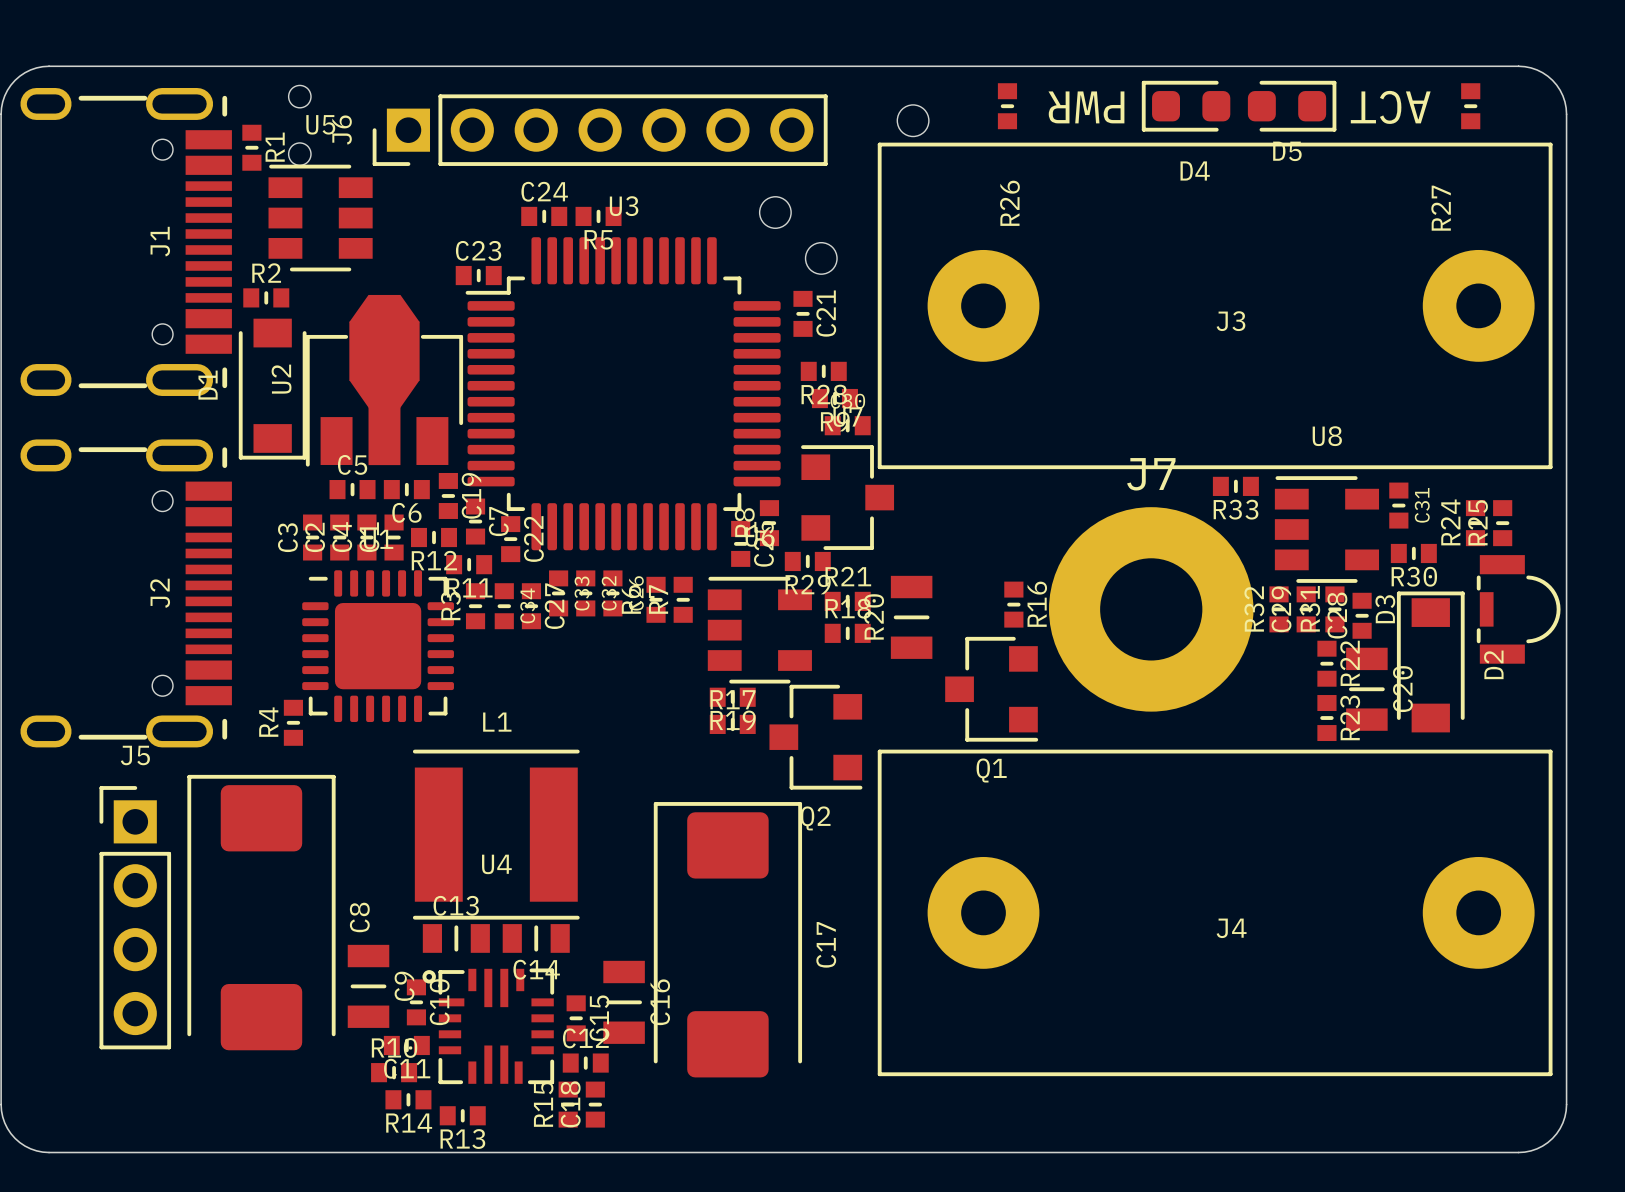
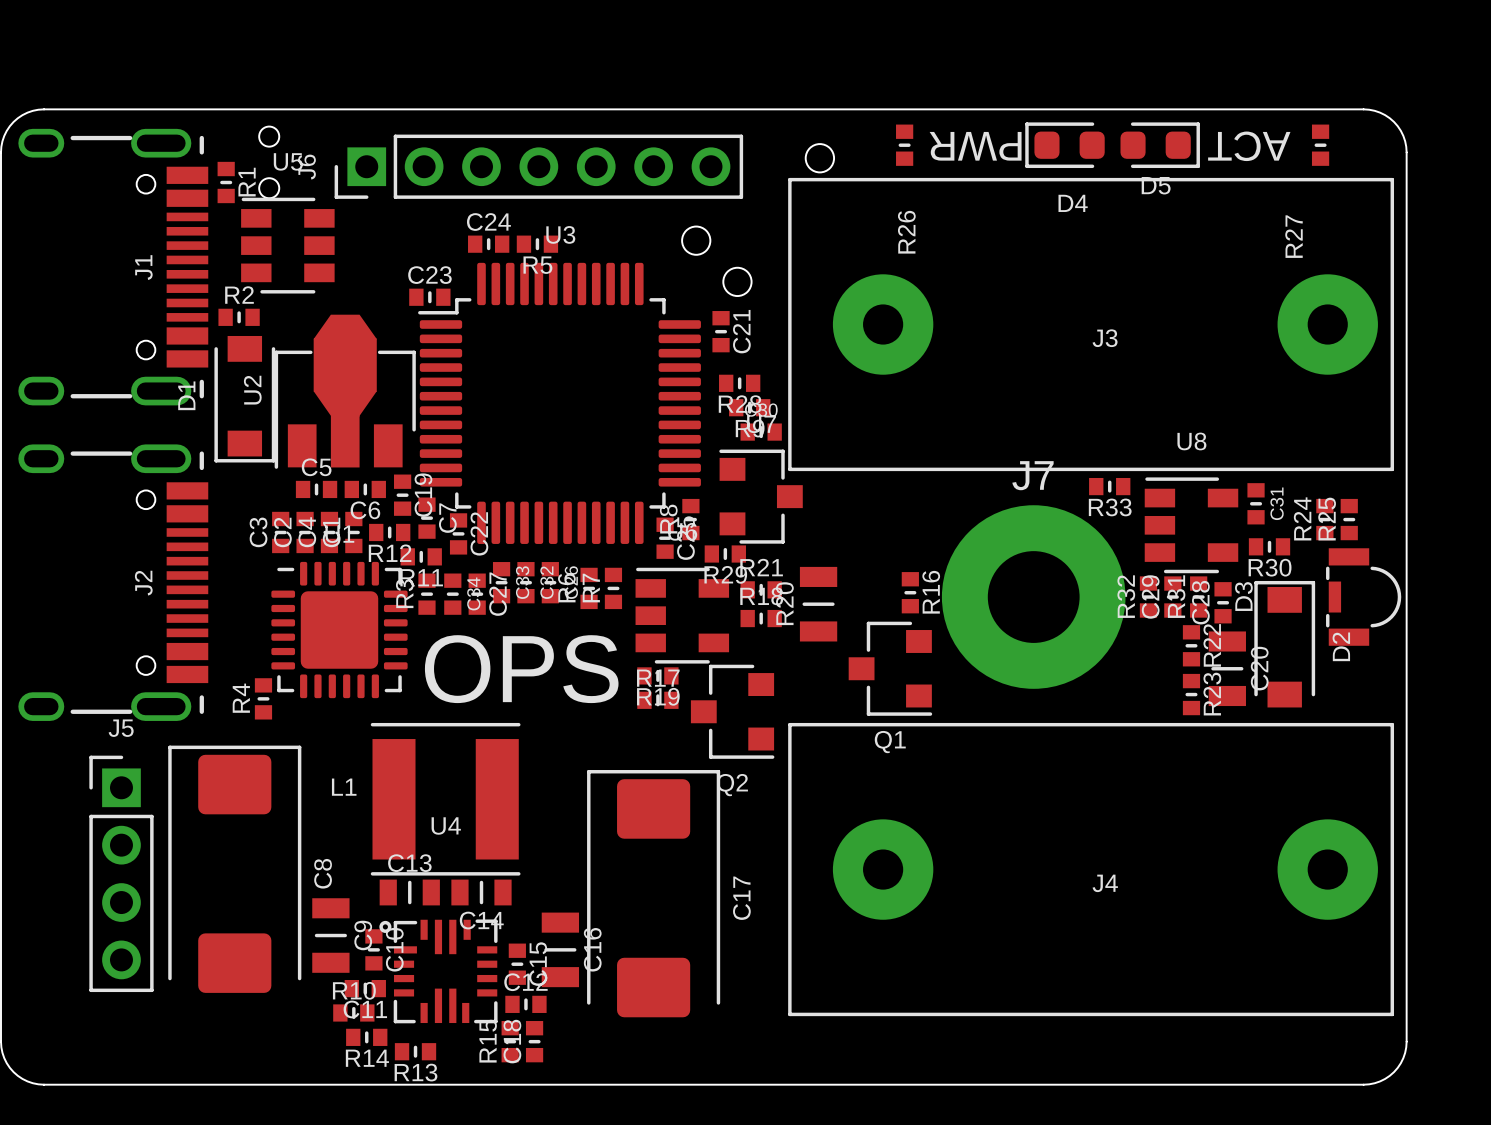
text: none -> OPS (521, 669)
L1 name position: L1 (497, 722) -> L1 (344, 787)

